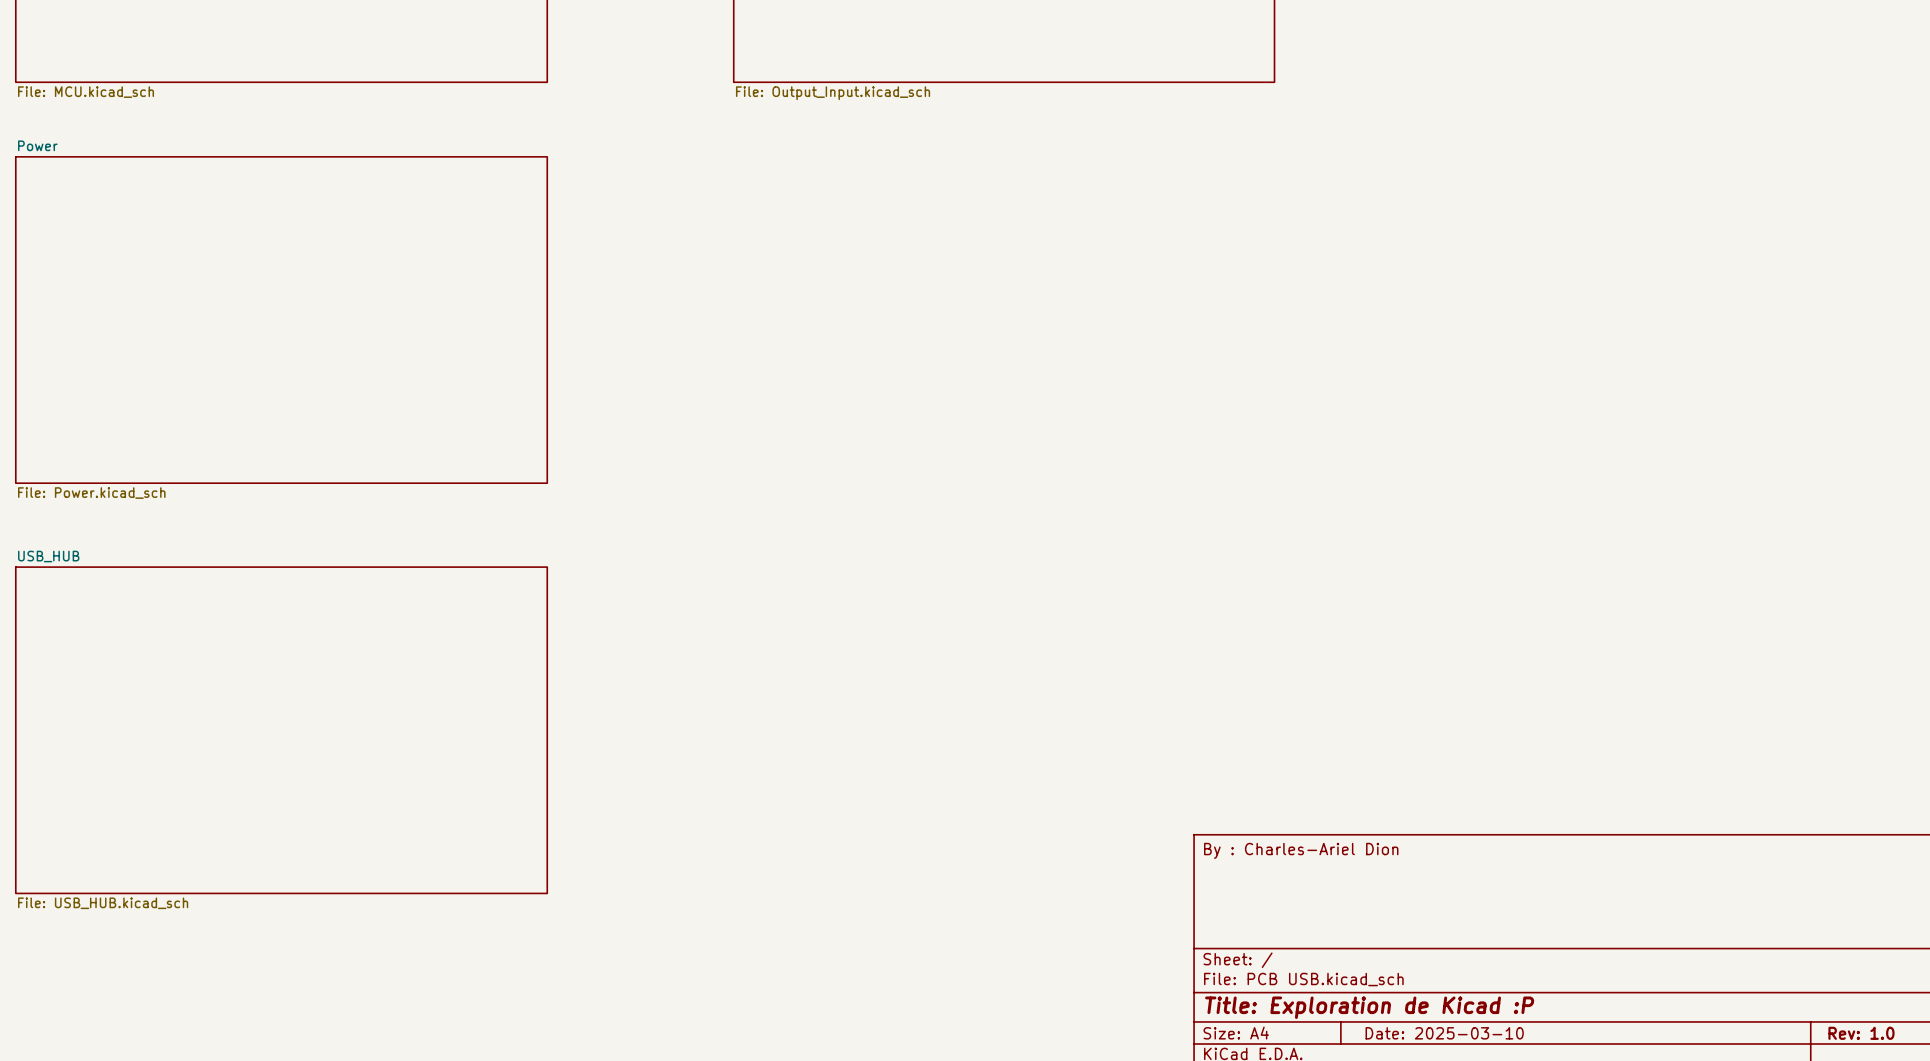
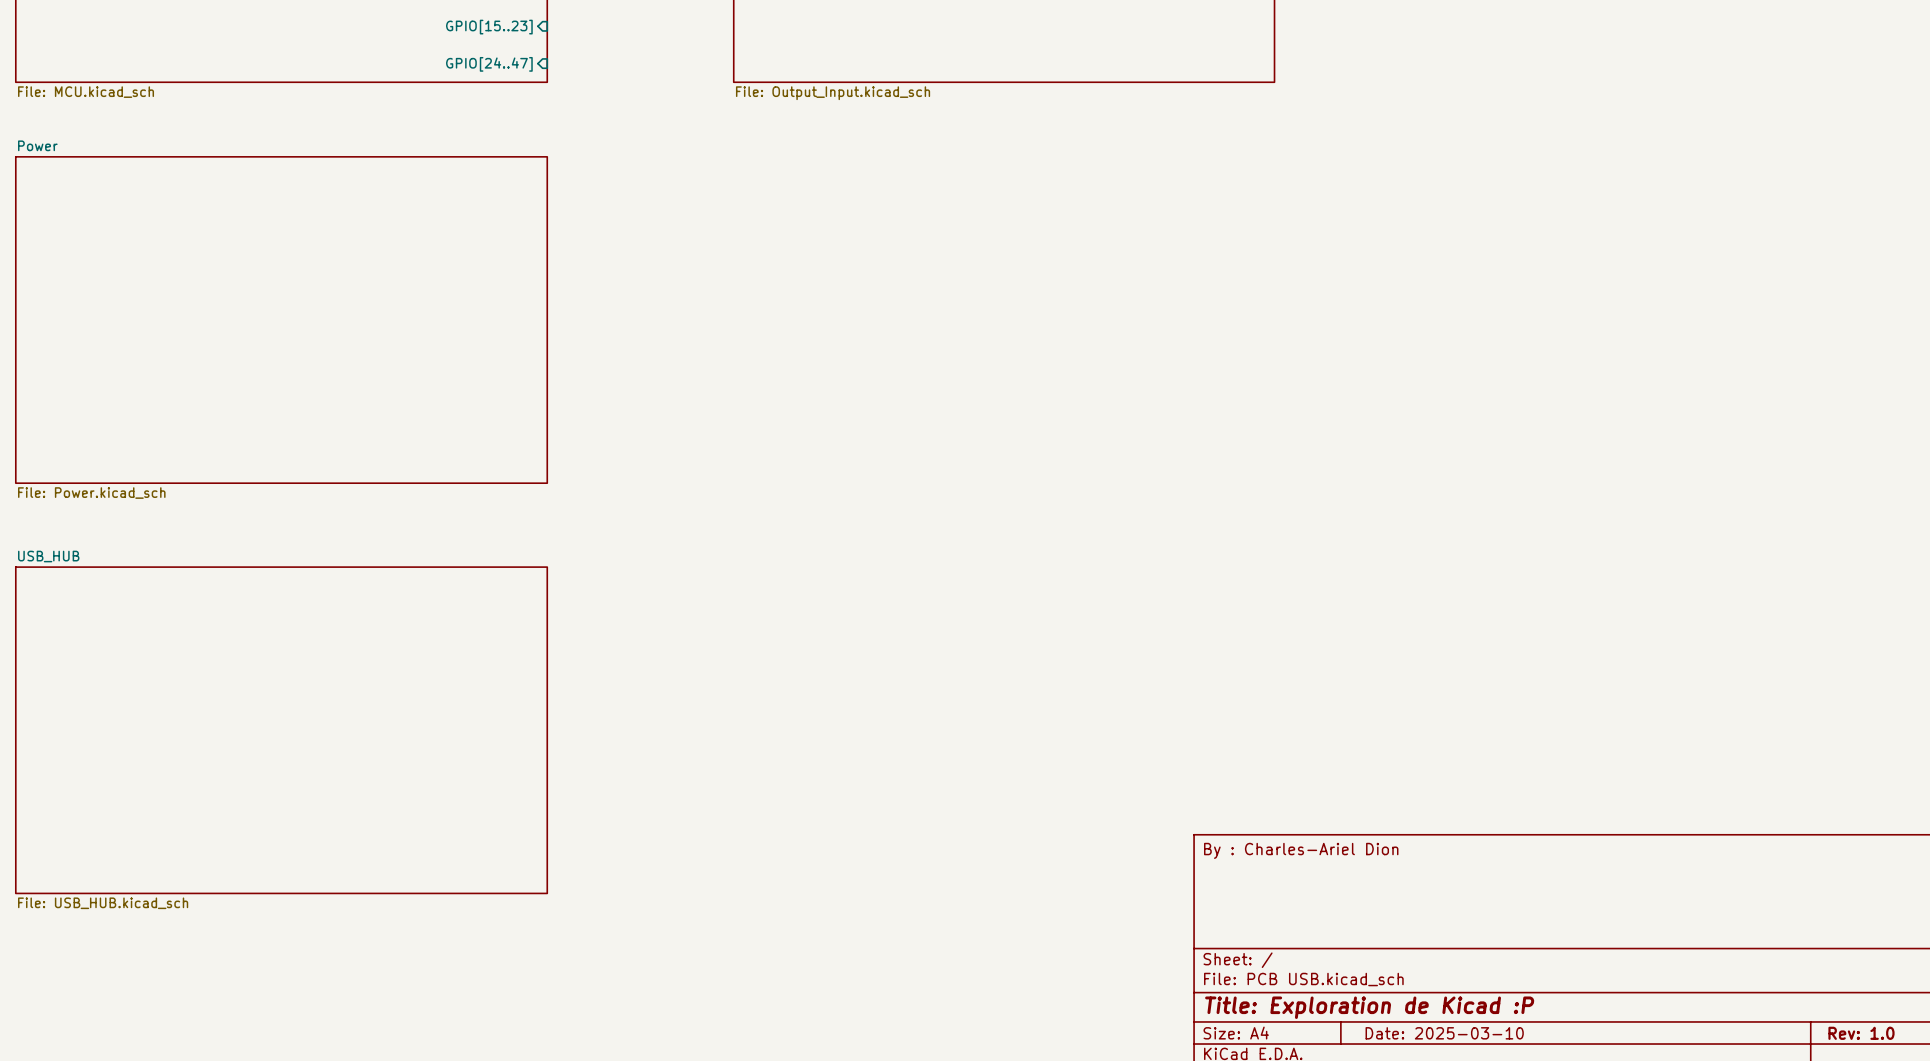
sheet pin: none -> GPIO[15..23] (489, 27)
sheet pin: none -> GPIO[24..47] (489, 64)

